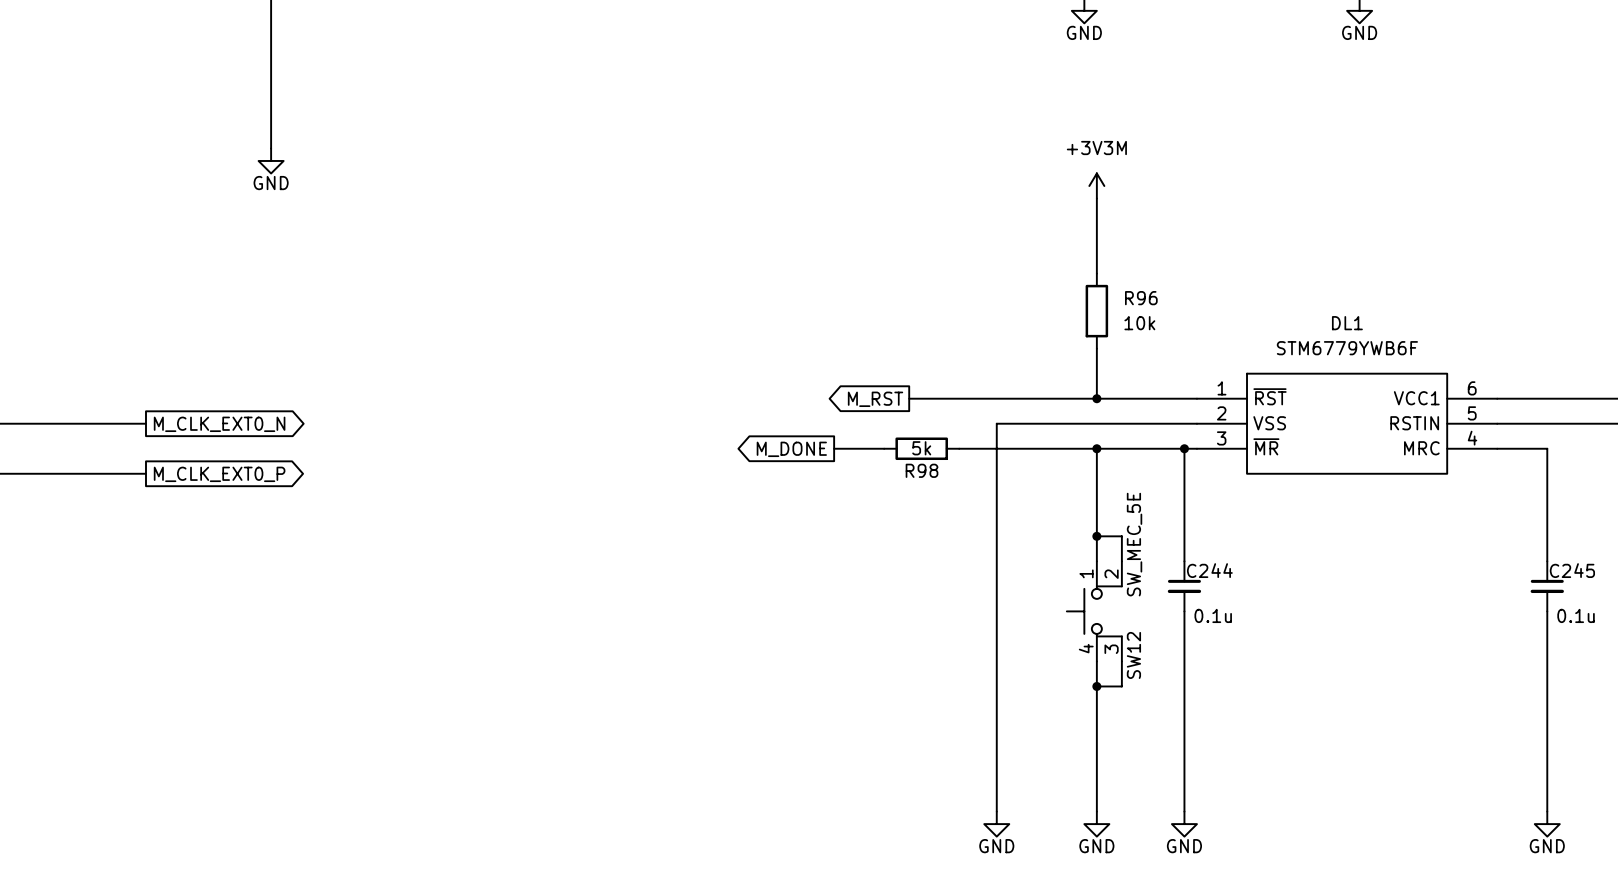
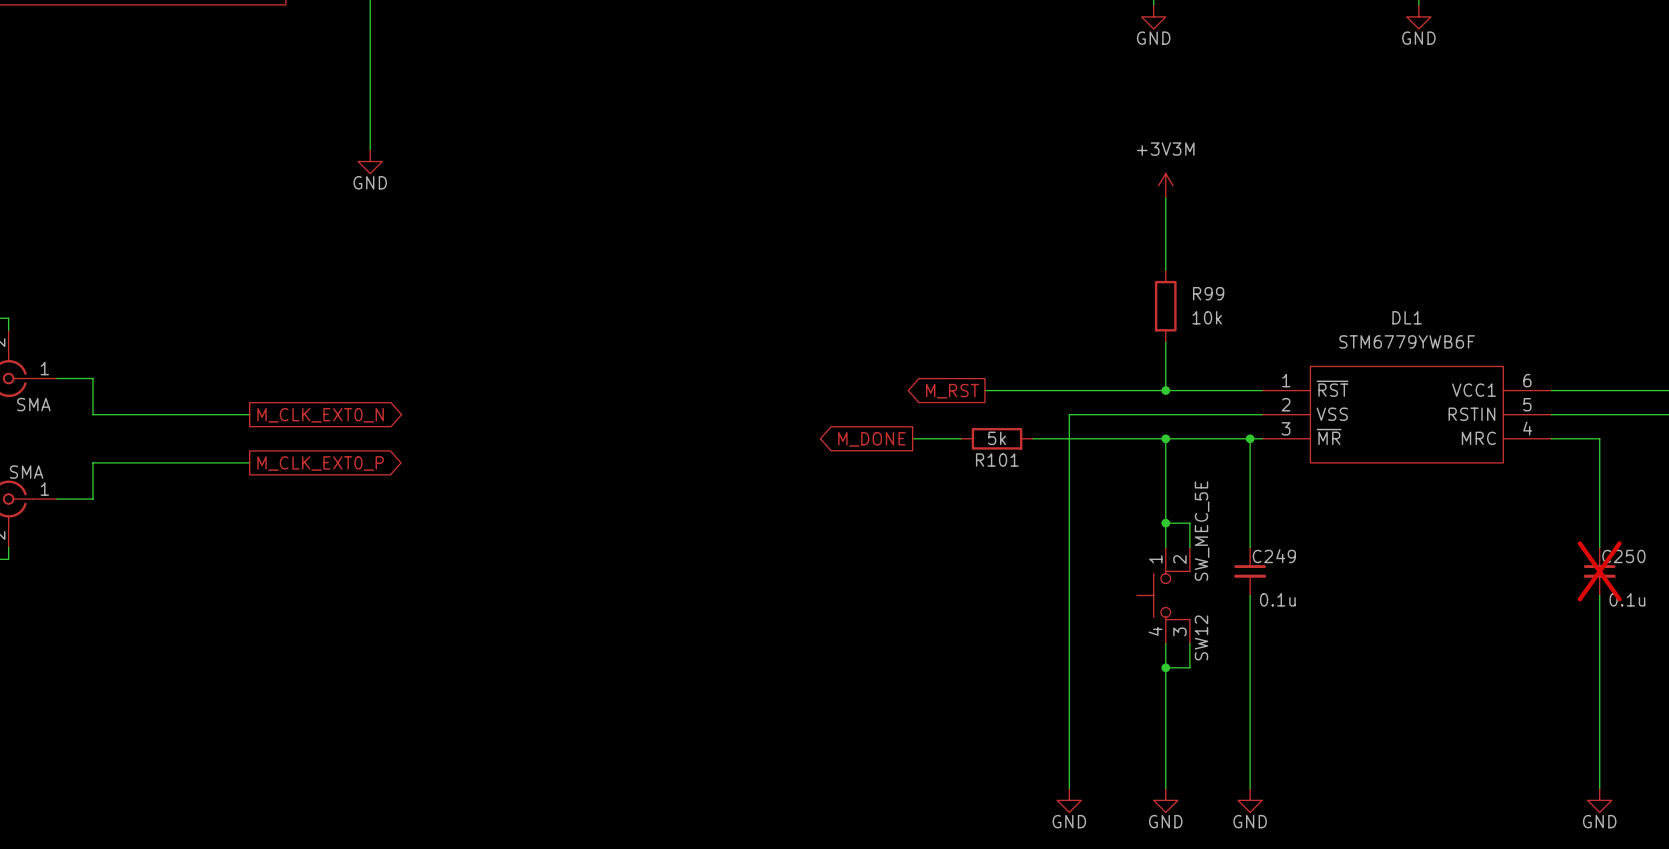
R96 name: R96 (1141, 298) -> R99 (1208, 293)
R98 name: R98 (922, 470) -> R101 (997, 460)
C244 name: C244 (1209, 570) -> C249 (1274, 556)
C245 name: C245 (1572, 570) -> C250 (1623, 556)
C245 do-not-place cross: none -> (1599, 571)

